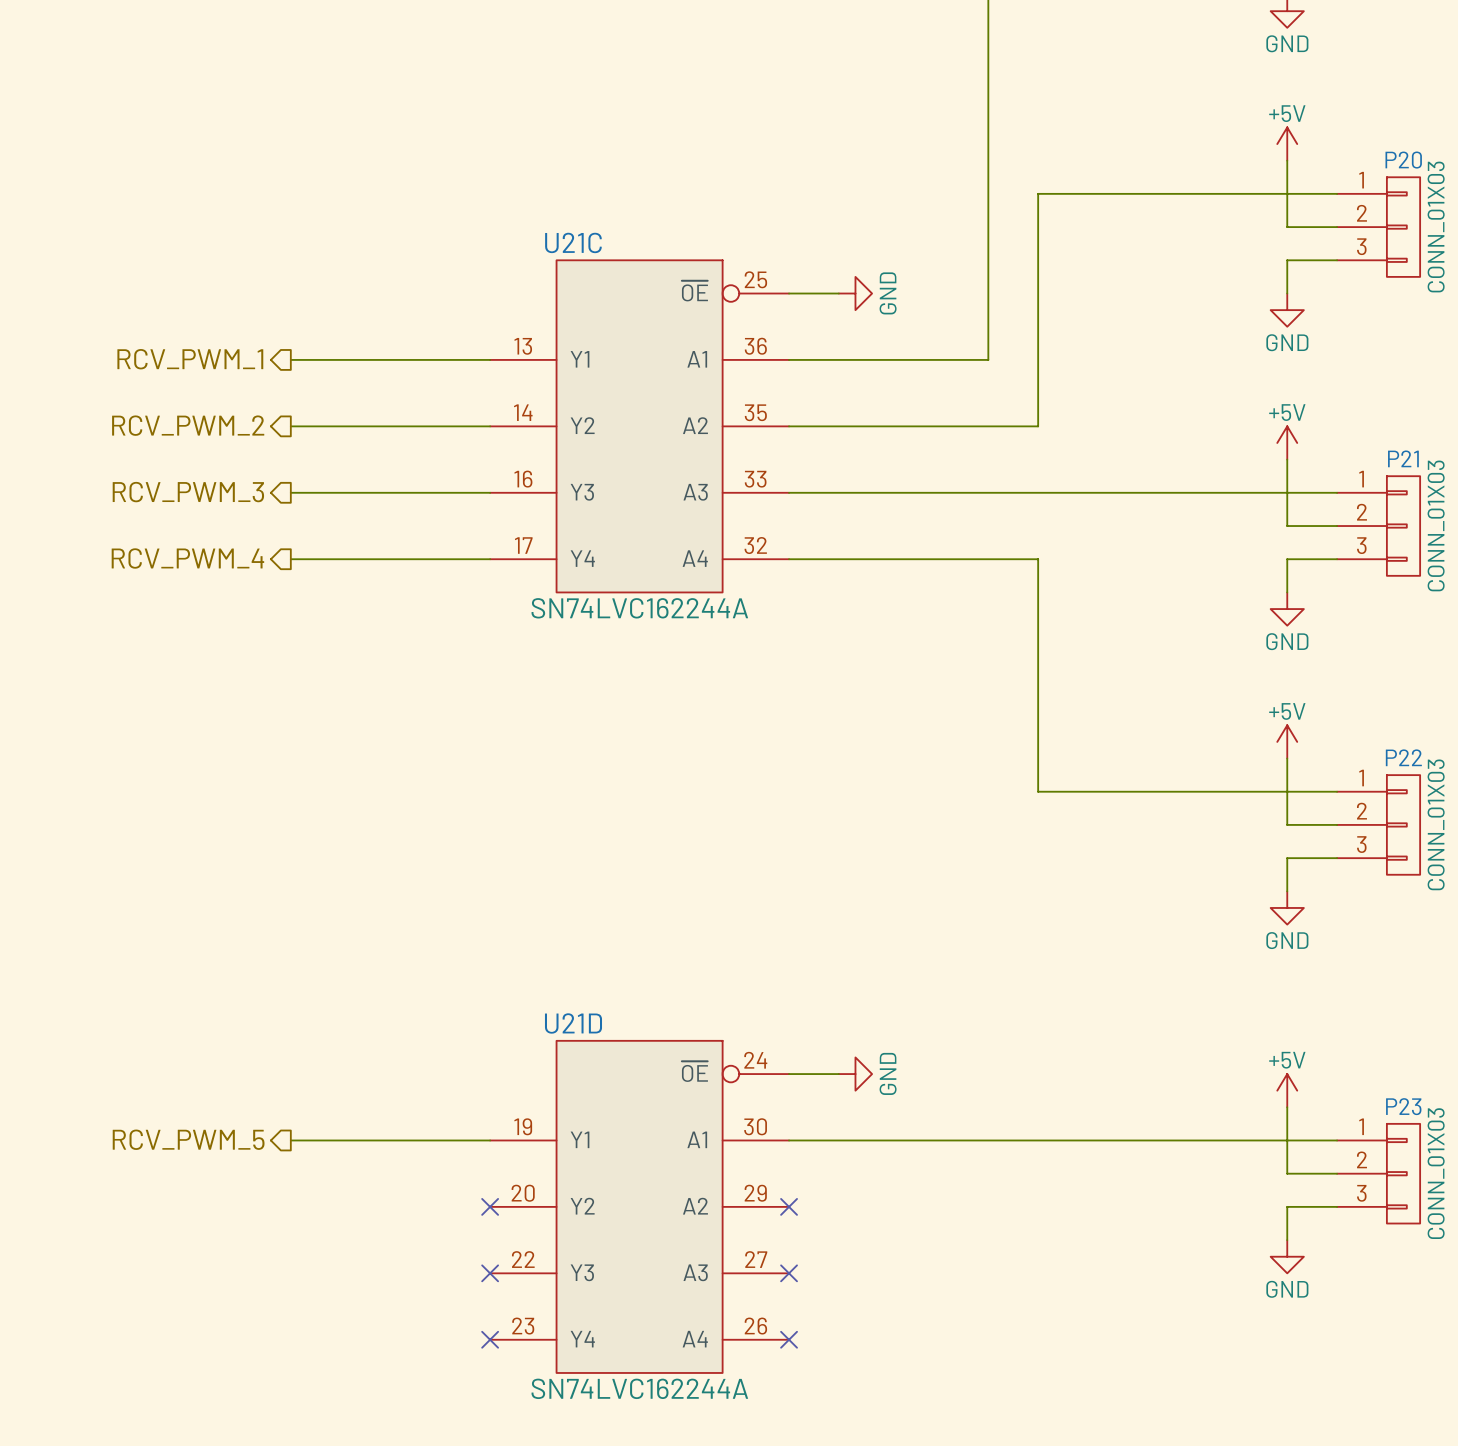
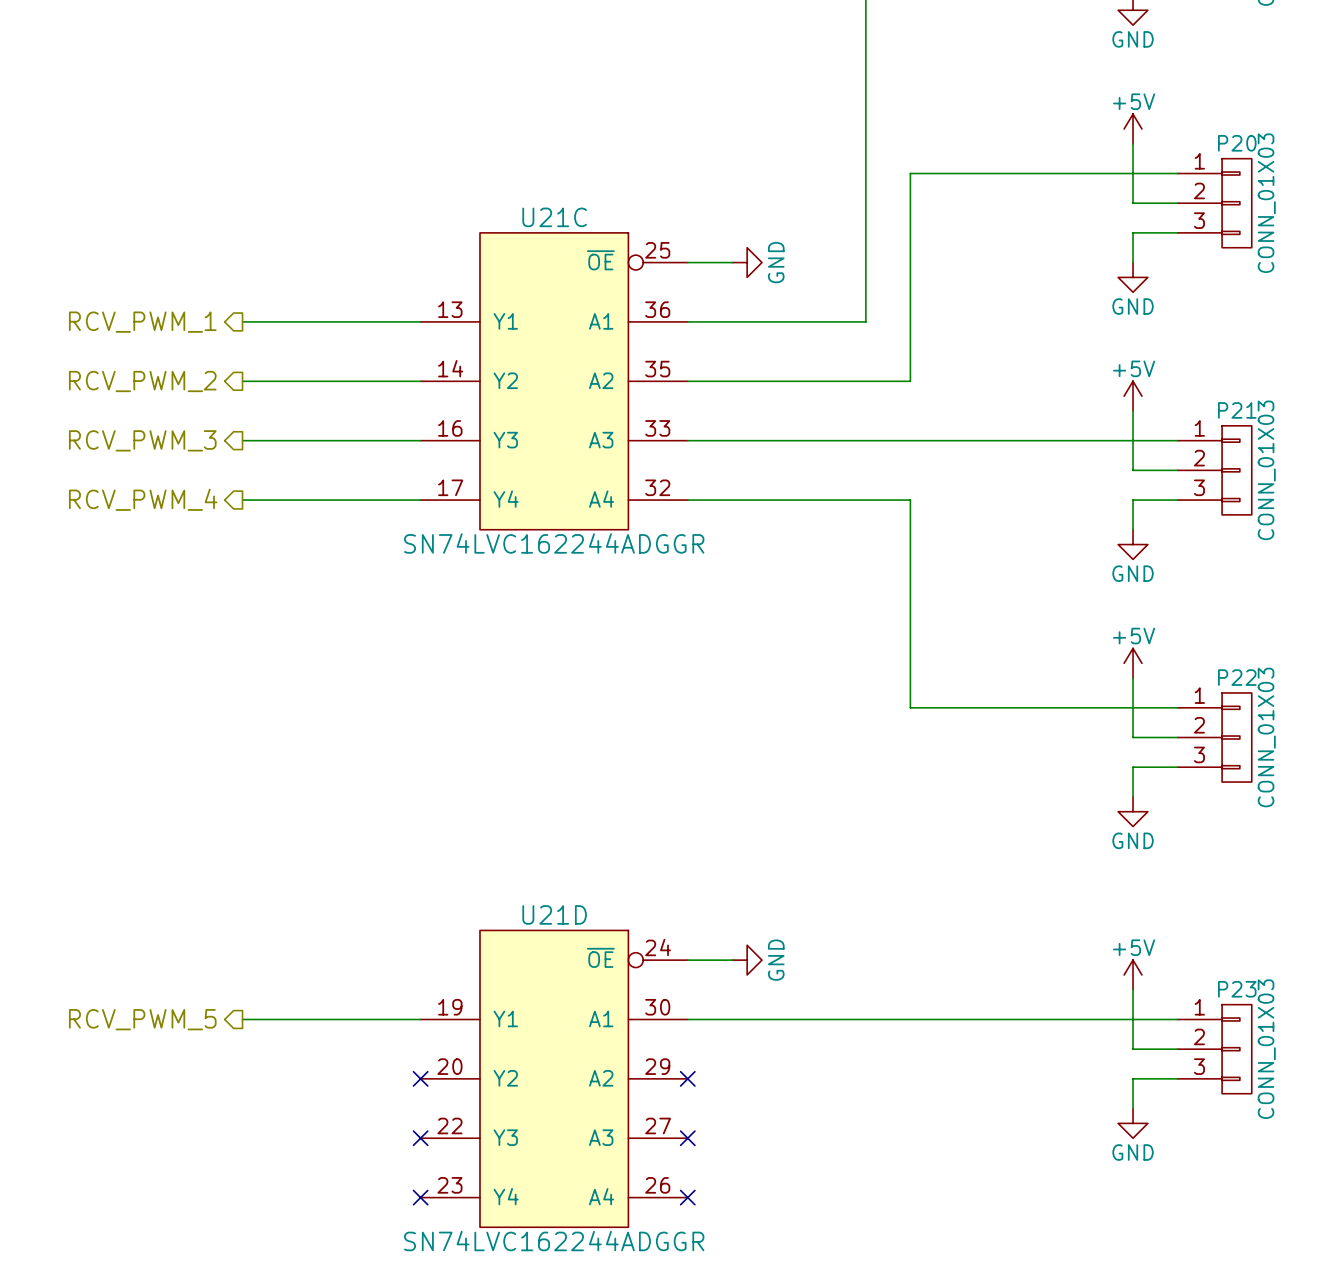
U21C name position: U21C (573, 242) -> U21C (554, 217)
U21C value: SN74LVC162244A (639, 608) -> SN74LVC162244ADGGR (554, 543)
U21D name position: U21D (573, 1023) -> U21D (554, 914)
U21D value: SN74LVC162244A (639, 1388) -> SN74LVC162244ADGGR (554, 1241)

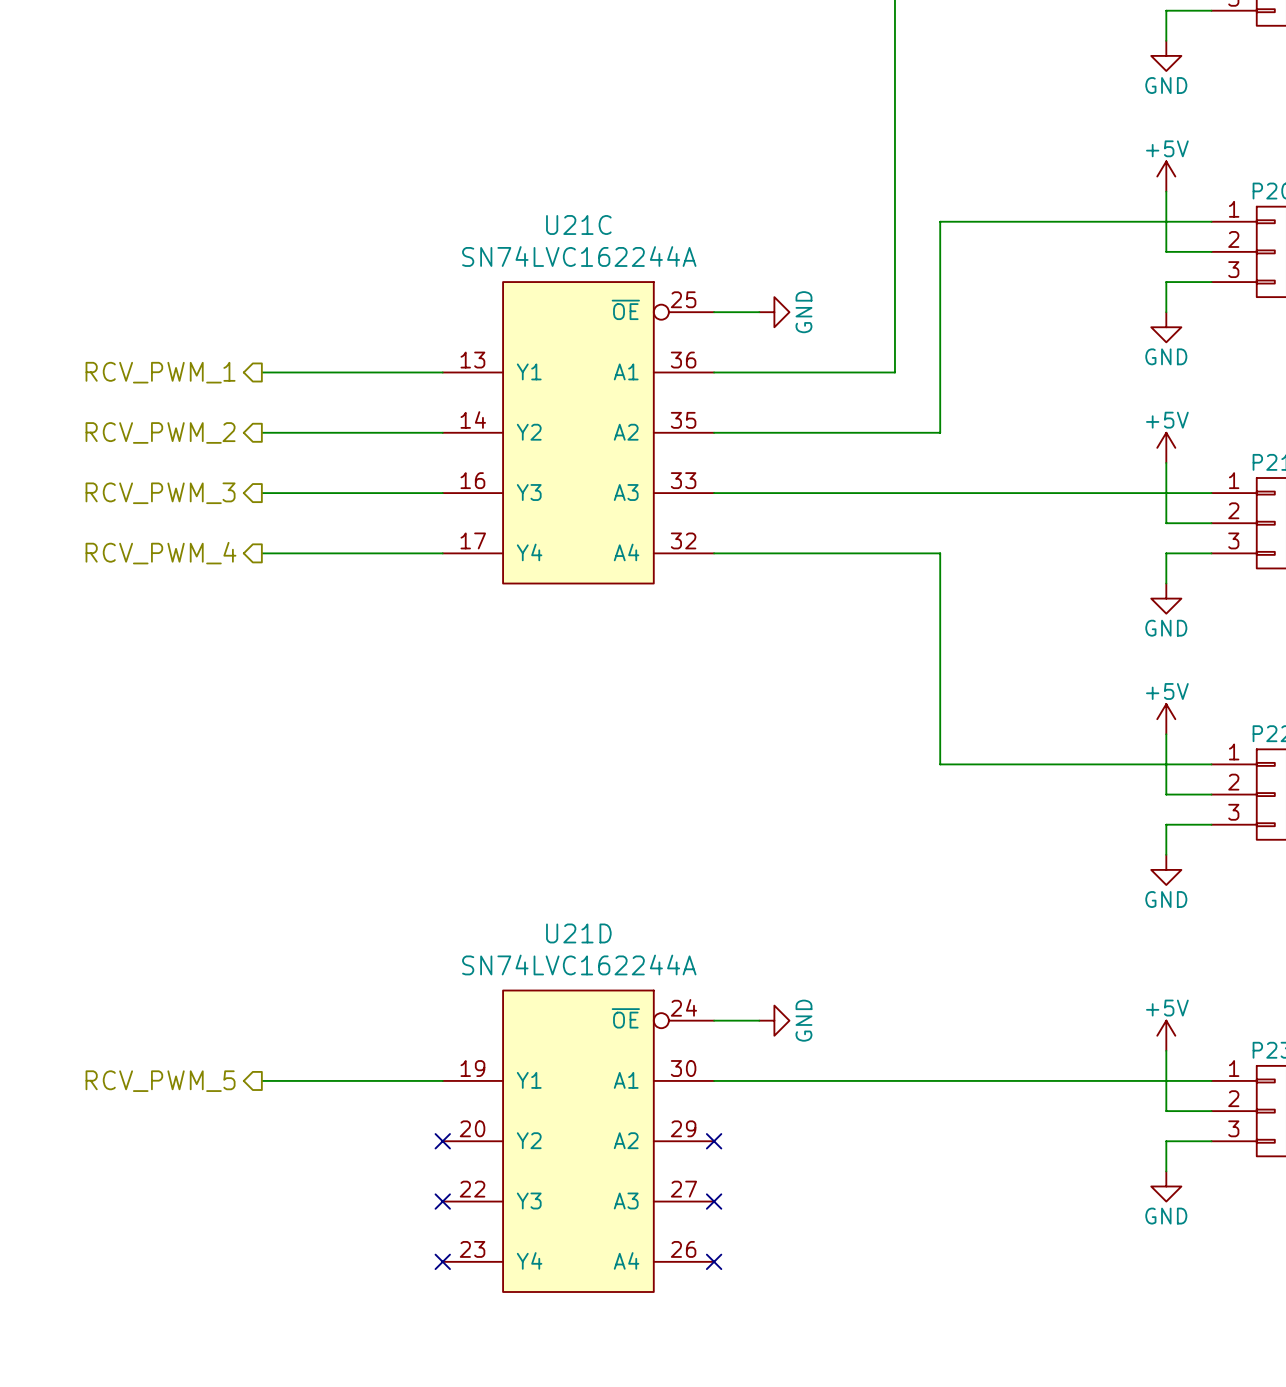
U21C name position: U21C (554, 217) -> U21C (578, 224)
U21C value: SN74LVC162244ADGGR (554, 543) -> SN74LVC162244A (579, 256)
U21D name position: U21D (554, 914) -> U21D (578, 933)
U21D value: SN74LVC162244ADGGR (554, 1241) -> SN74LVC162244A (579, 964)

